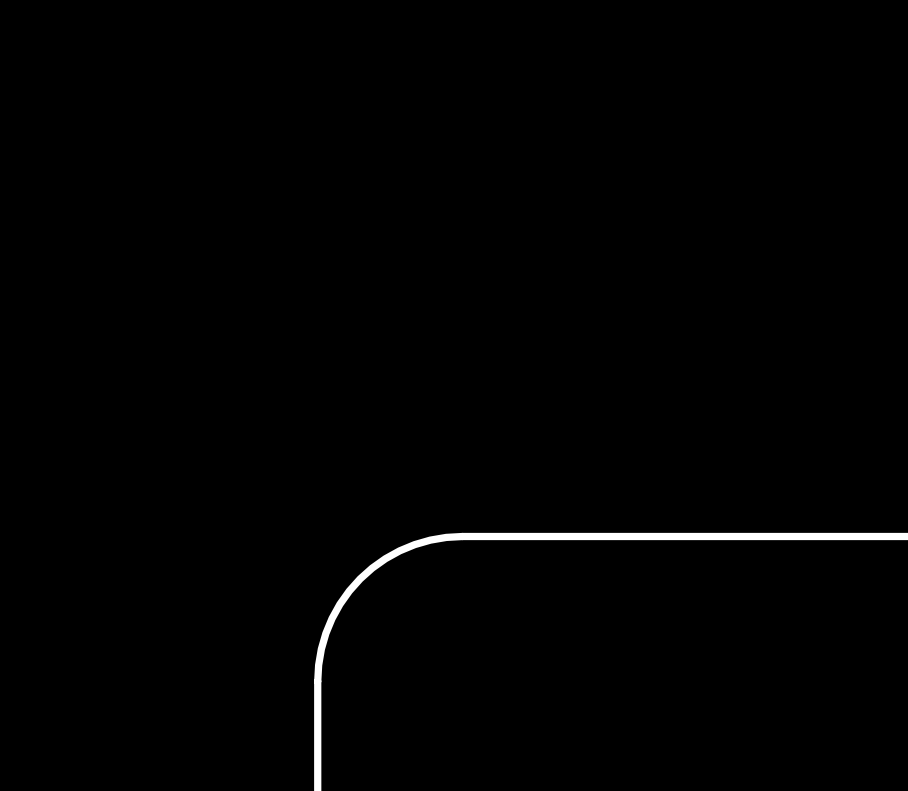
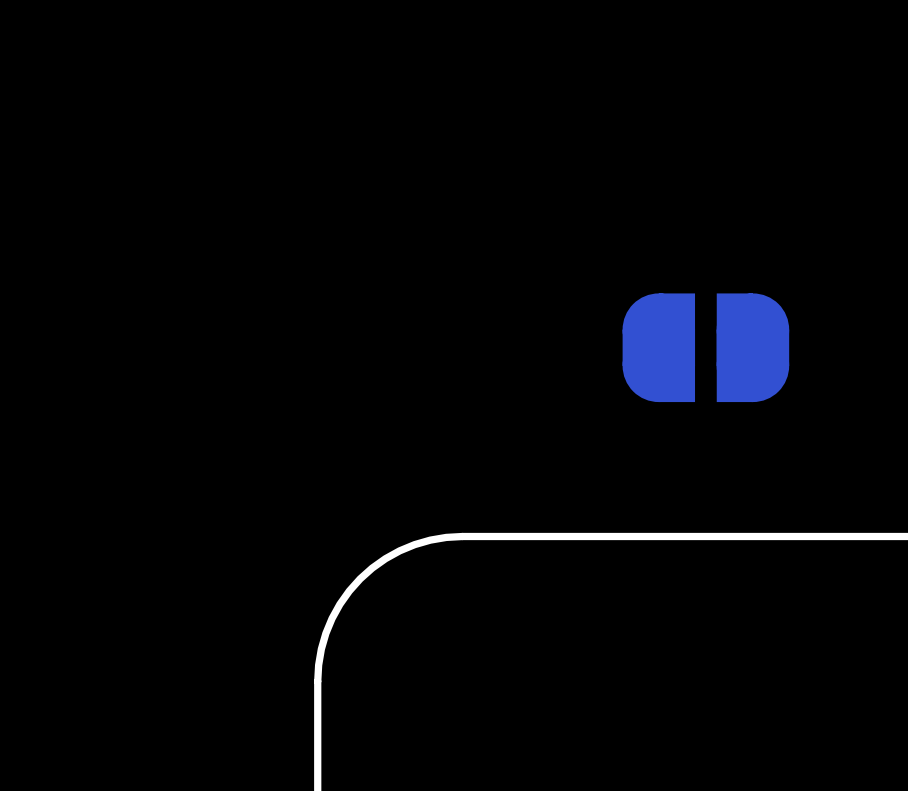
part: none -> (705, 347)

